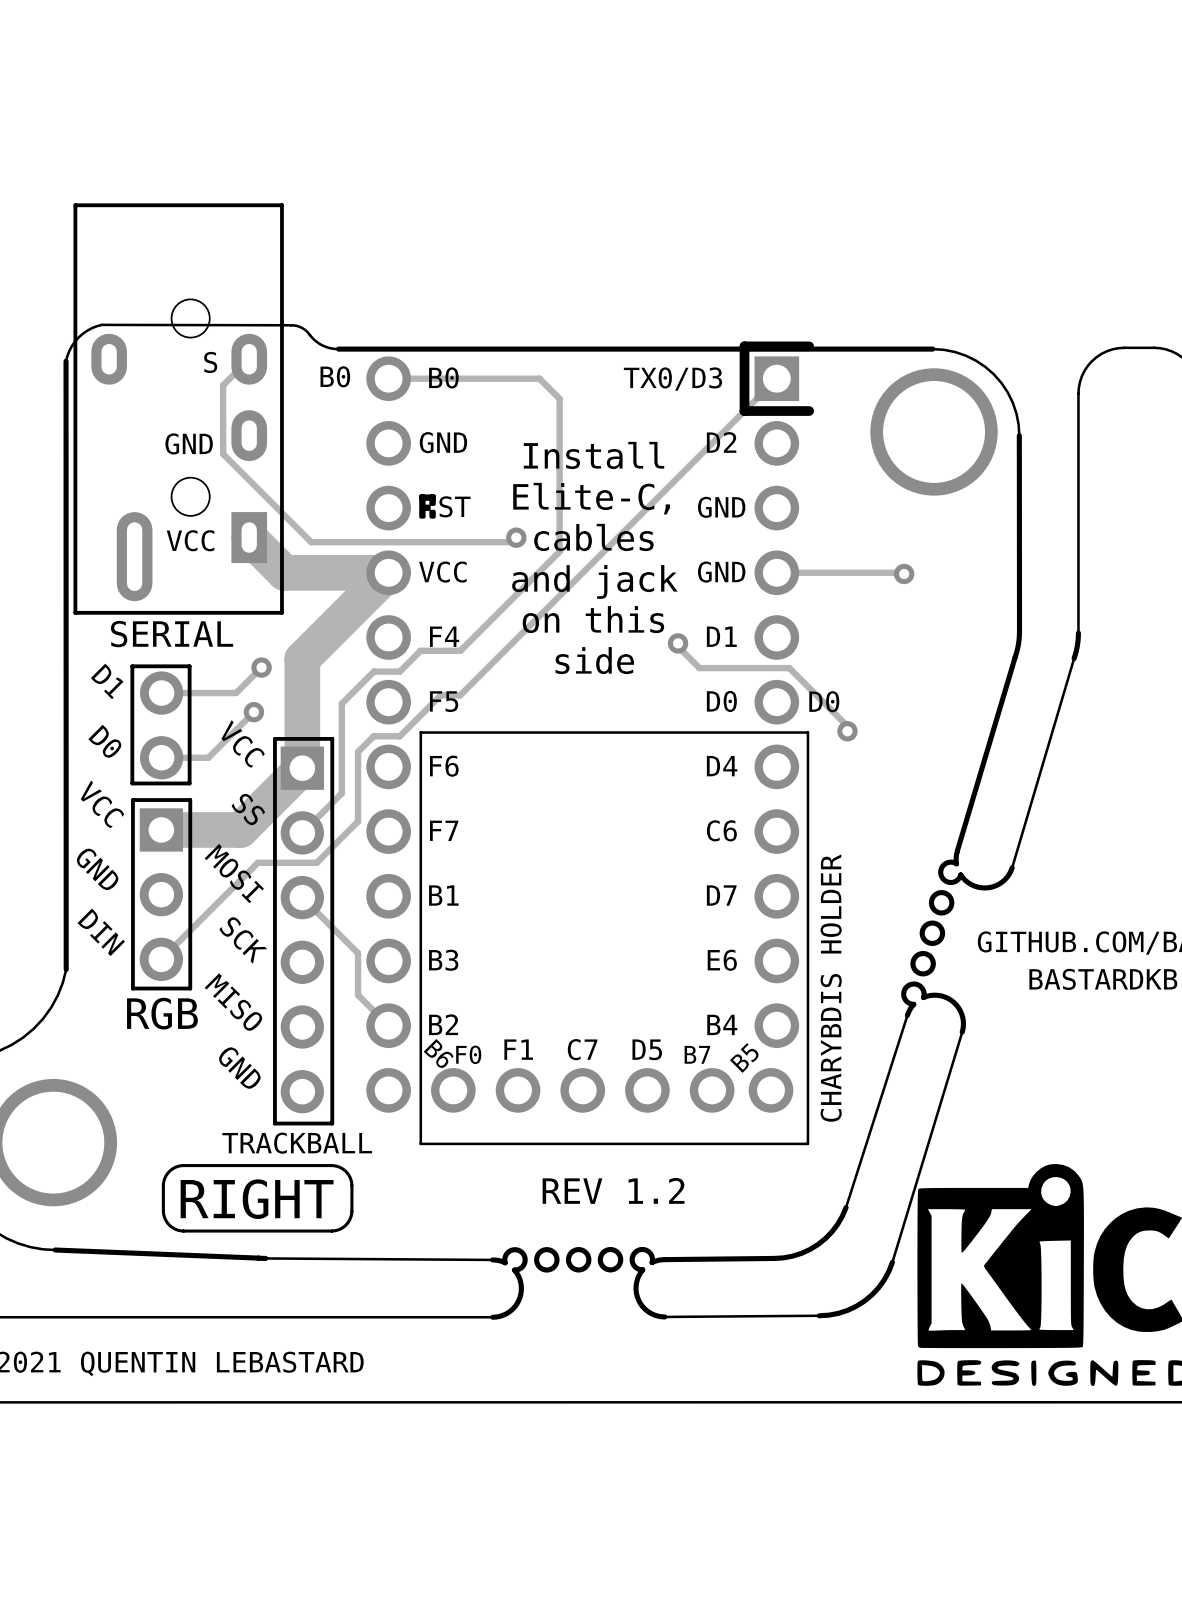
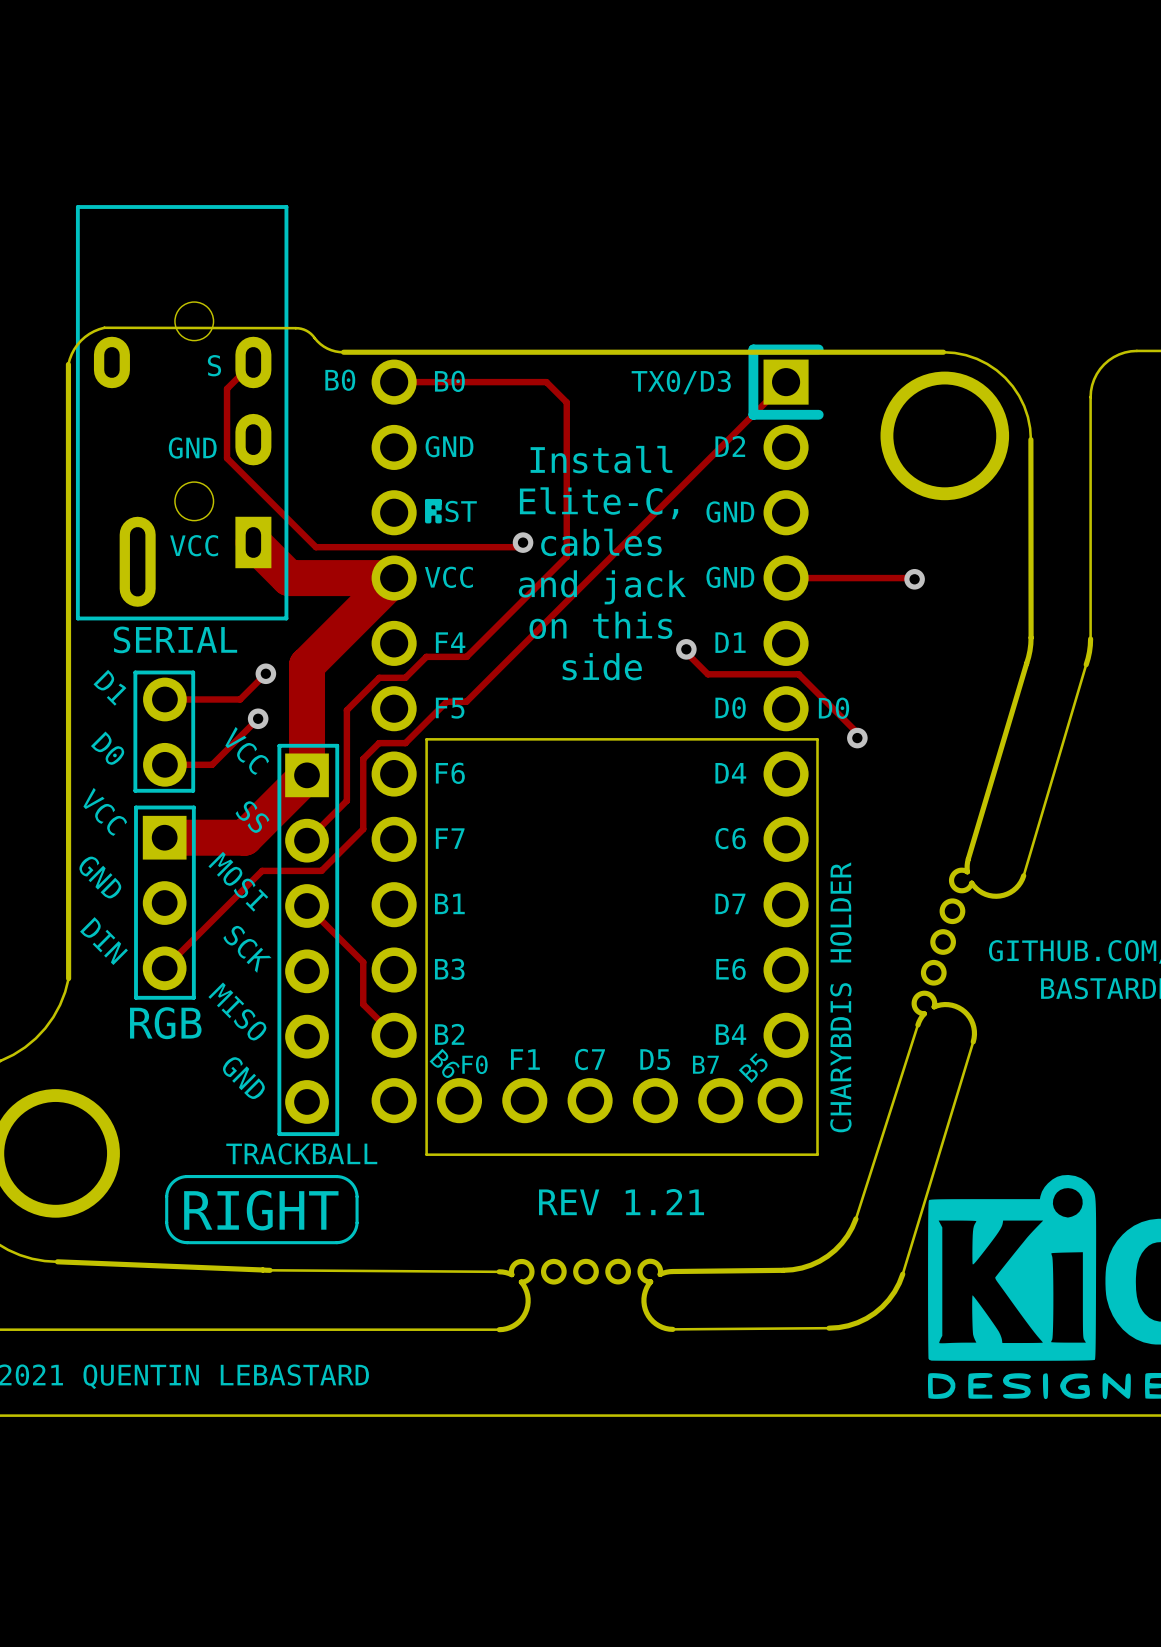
text: REV 1.2 (613, 1190) -> REV 1.21 (621, 1202)

